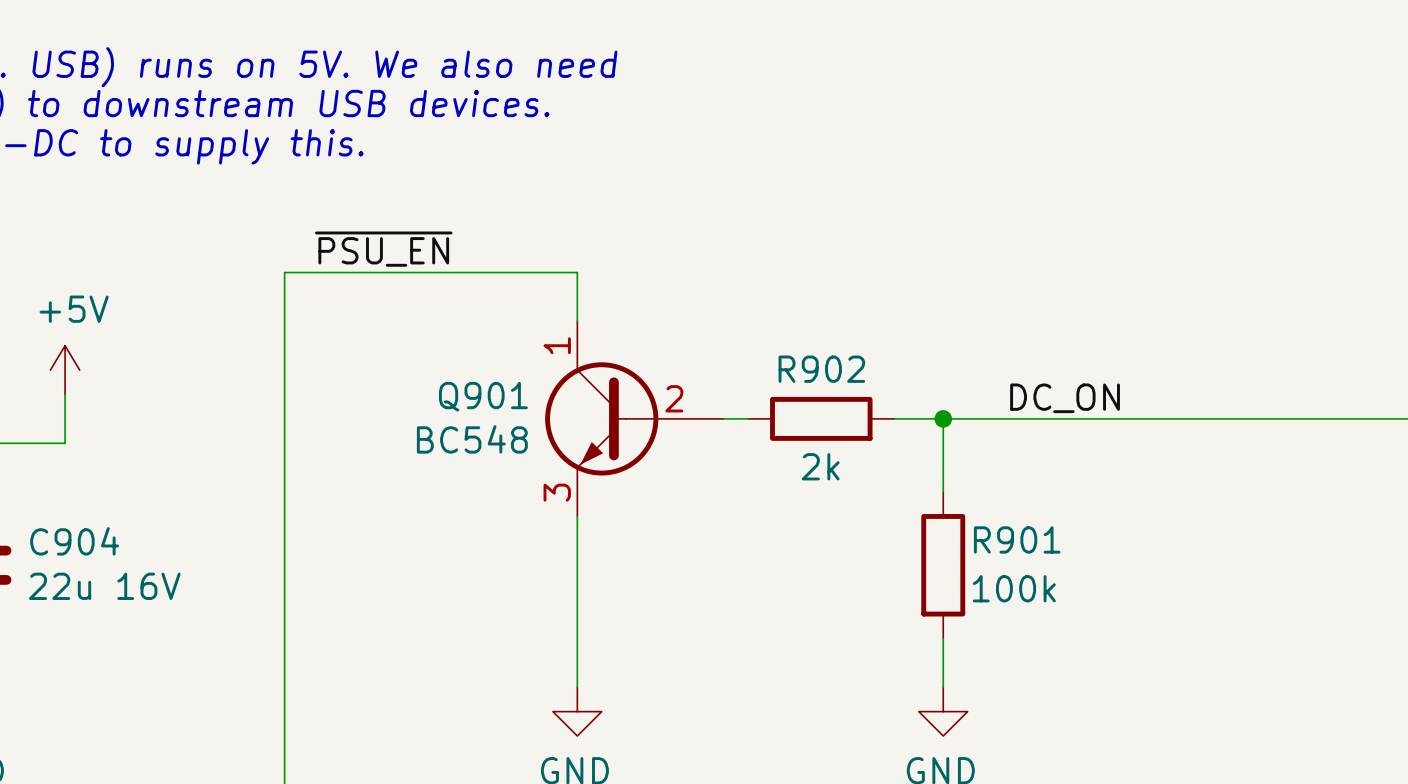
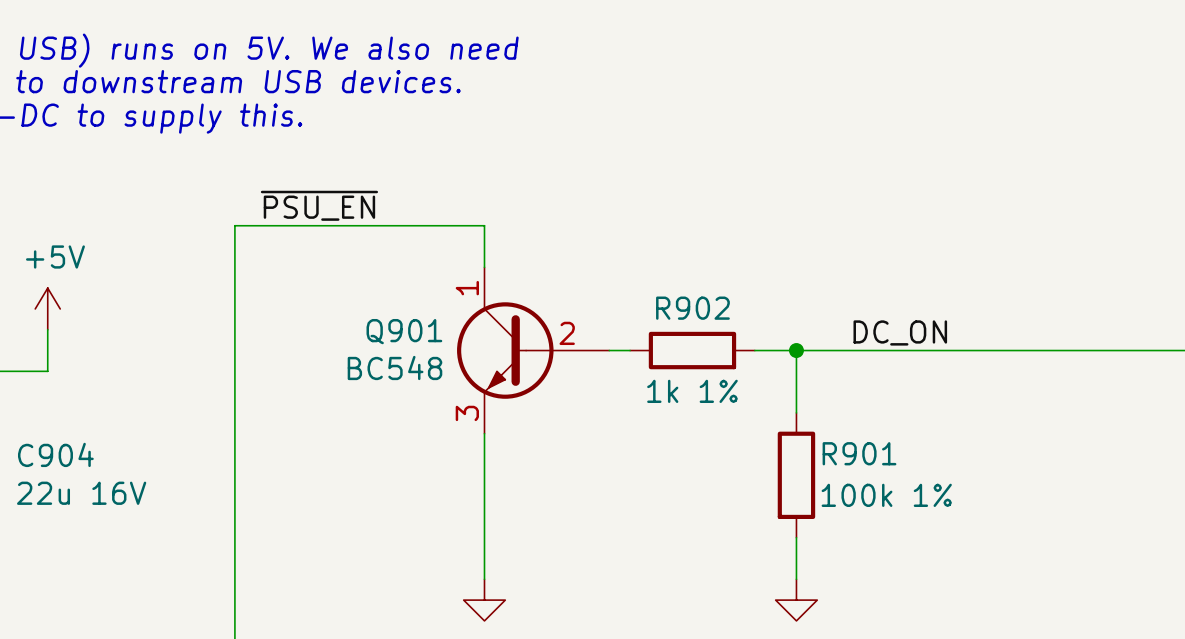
R902 value: 2k (820, 466) -> 1k 1% (692, 391)
R901 value: 100k (1014, 588) -> 100k 1% (886, 495)

